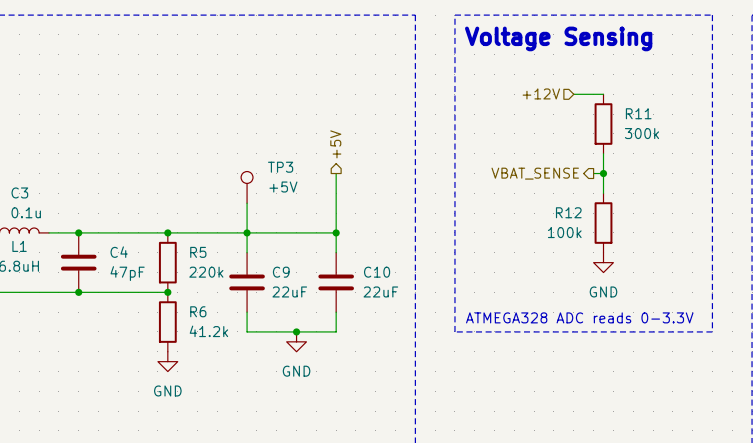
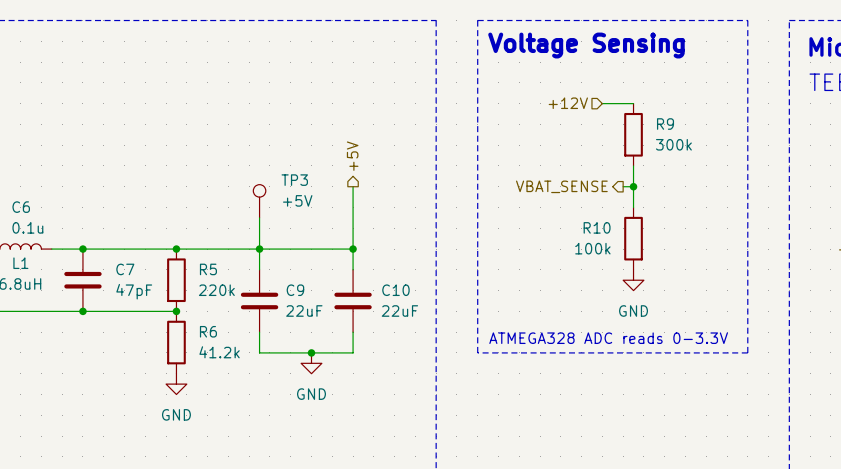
R11 name: R11 (638, 113) -> R9 (665, 124)
C3 name: C3 (19, 192) -> C6 (21, 207)
R12 name: R12 (568, 212) -> R10 (597, 227)
C4 name: C4 (119, 252) -> C7 (125, 269)

